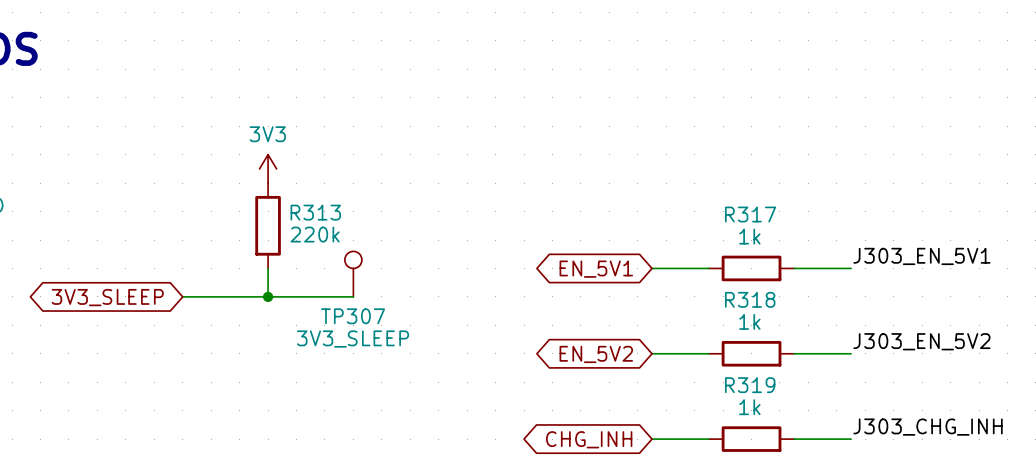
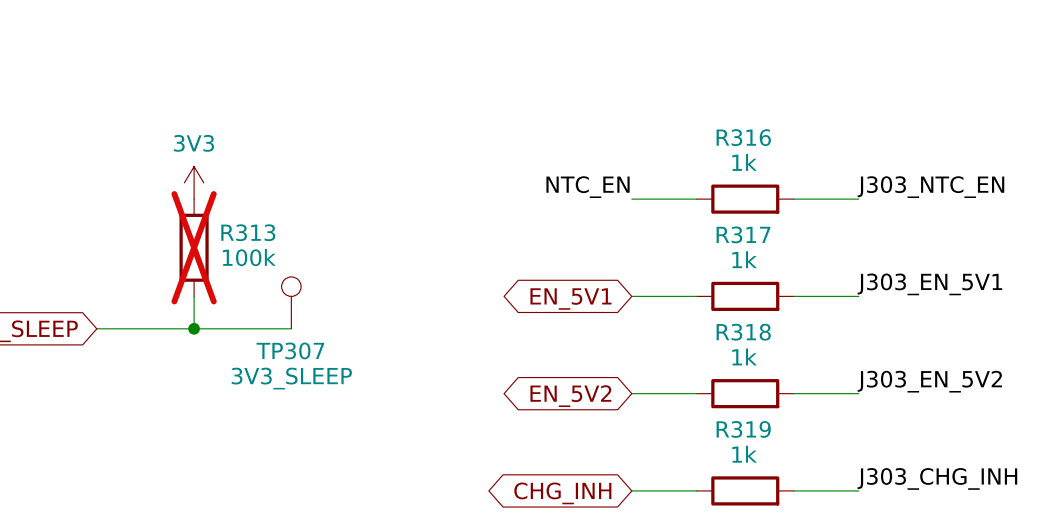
label: none -> NTC_EN (588, 187)
label: none -> J303_NTC_EN (930, 187)
wire: none -> (631, 199) (696, 199)
R316: none -> 1k (745, 199)
wire: none -> (793, 199) (858, 199)
R313 do-not-place cross: none -> (194, 247)
R313 value: 220k (315, 234) -> 100k (249, 257)

